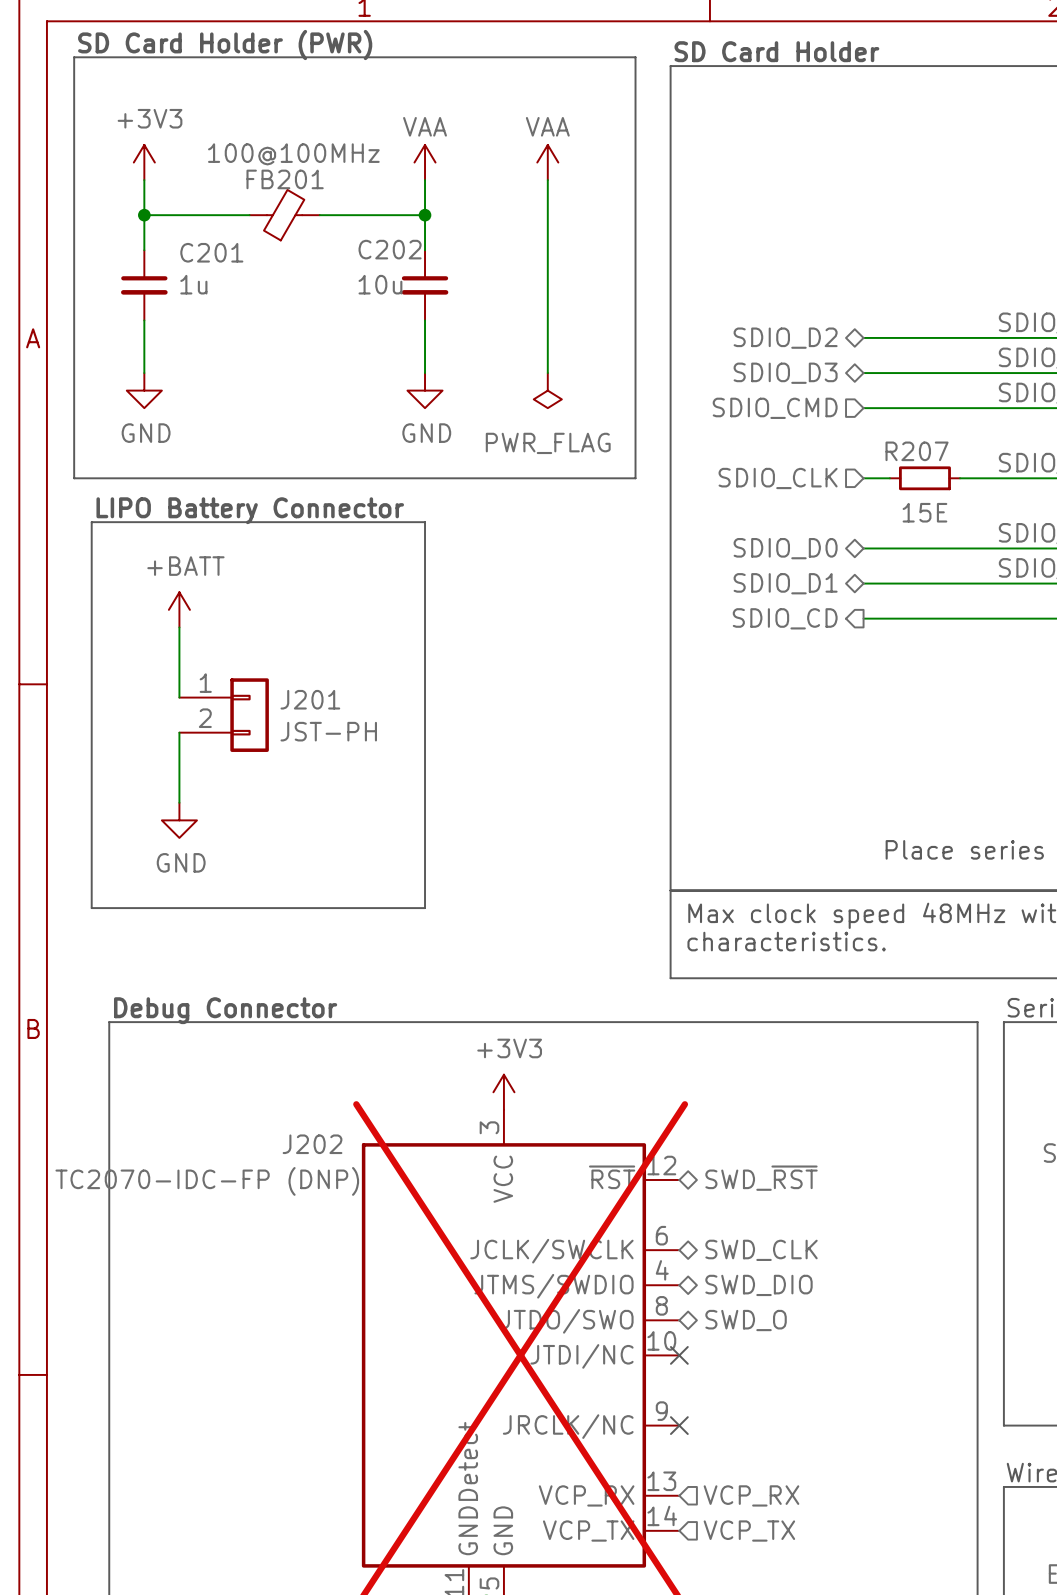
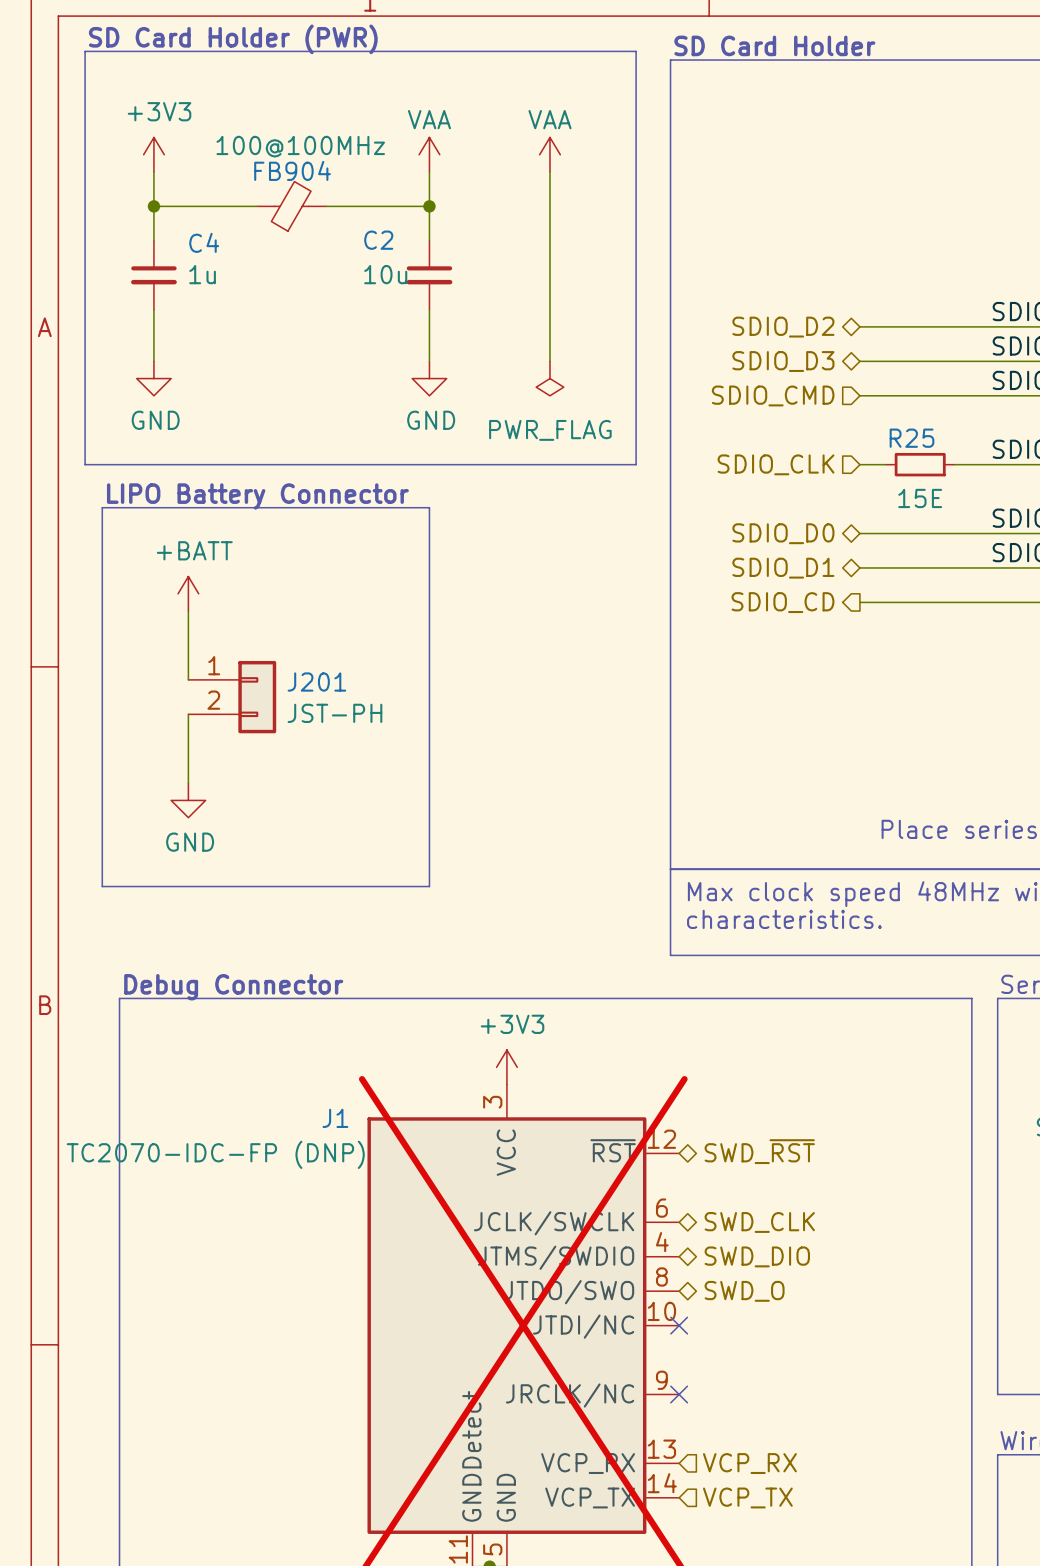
FB201 name: FB201 (285, 179) -> FB904 (292, 170)
C202 name: C202 (390, 249) -> C2 (378, 240)
C201 name: C201 (211, 252) -> C4 (204, 242)
R207 name: R207 (917, 451) -> R25 (912, 438)
J202 name: J202 (312, 1144) -> J1 (335, 1118)

